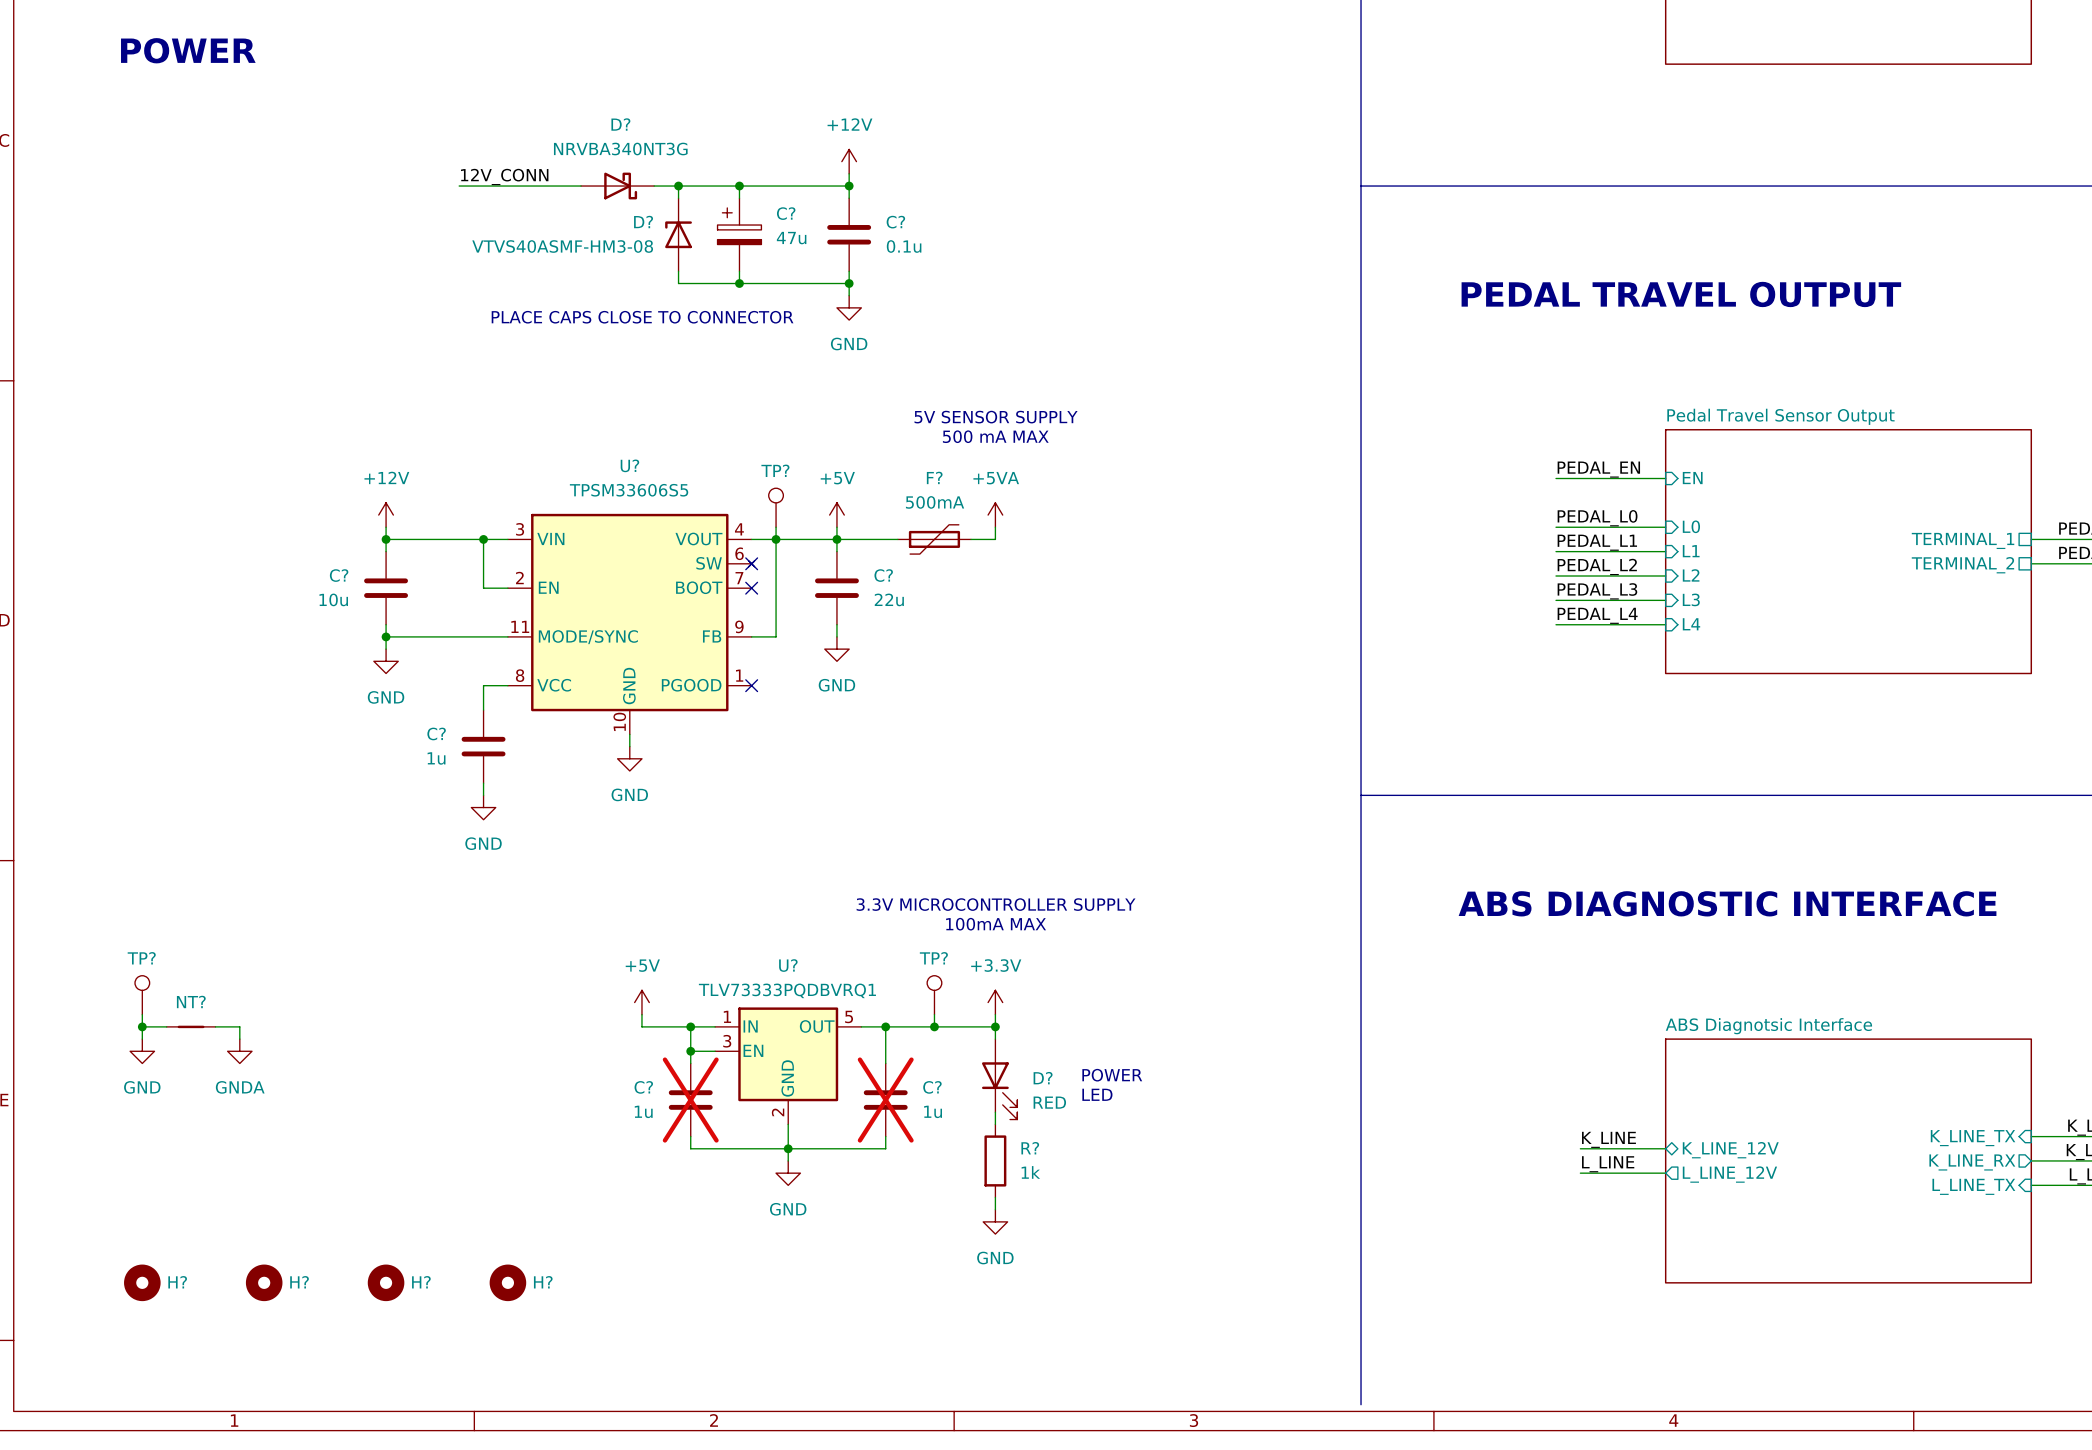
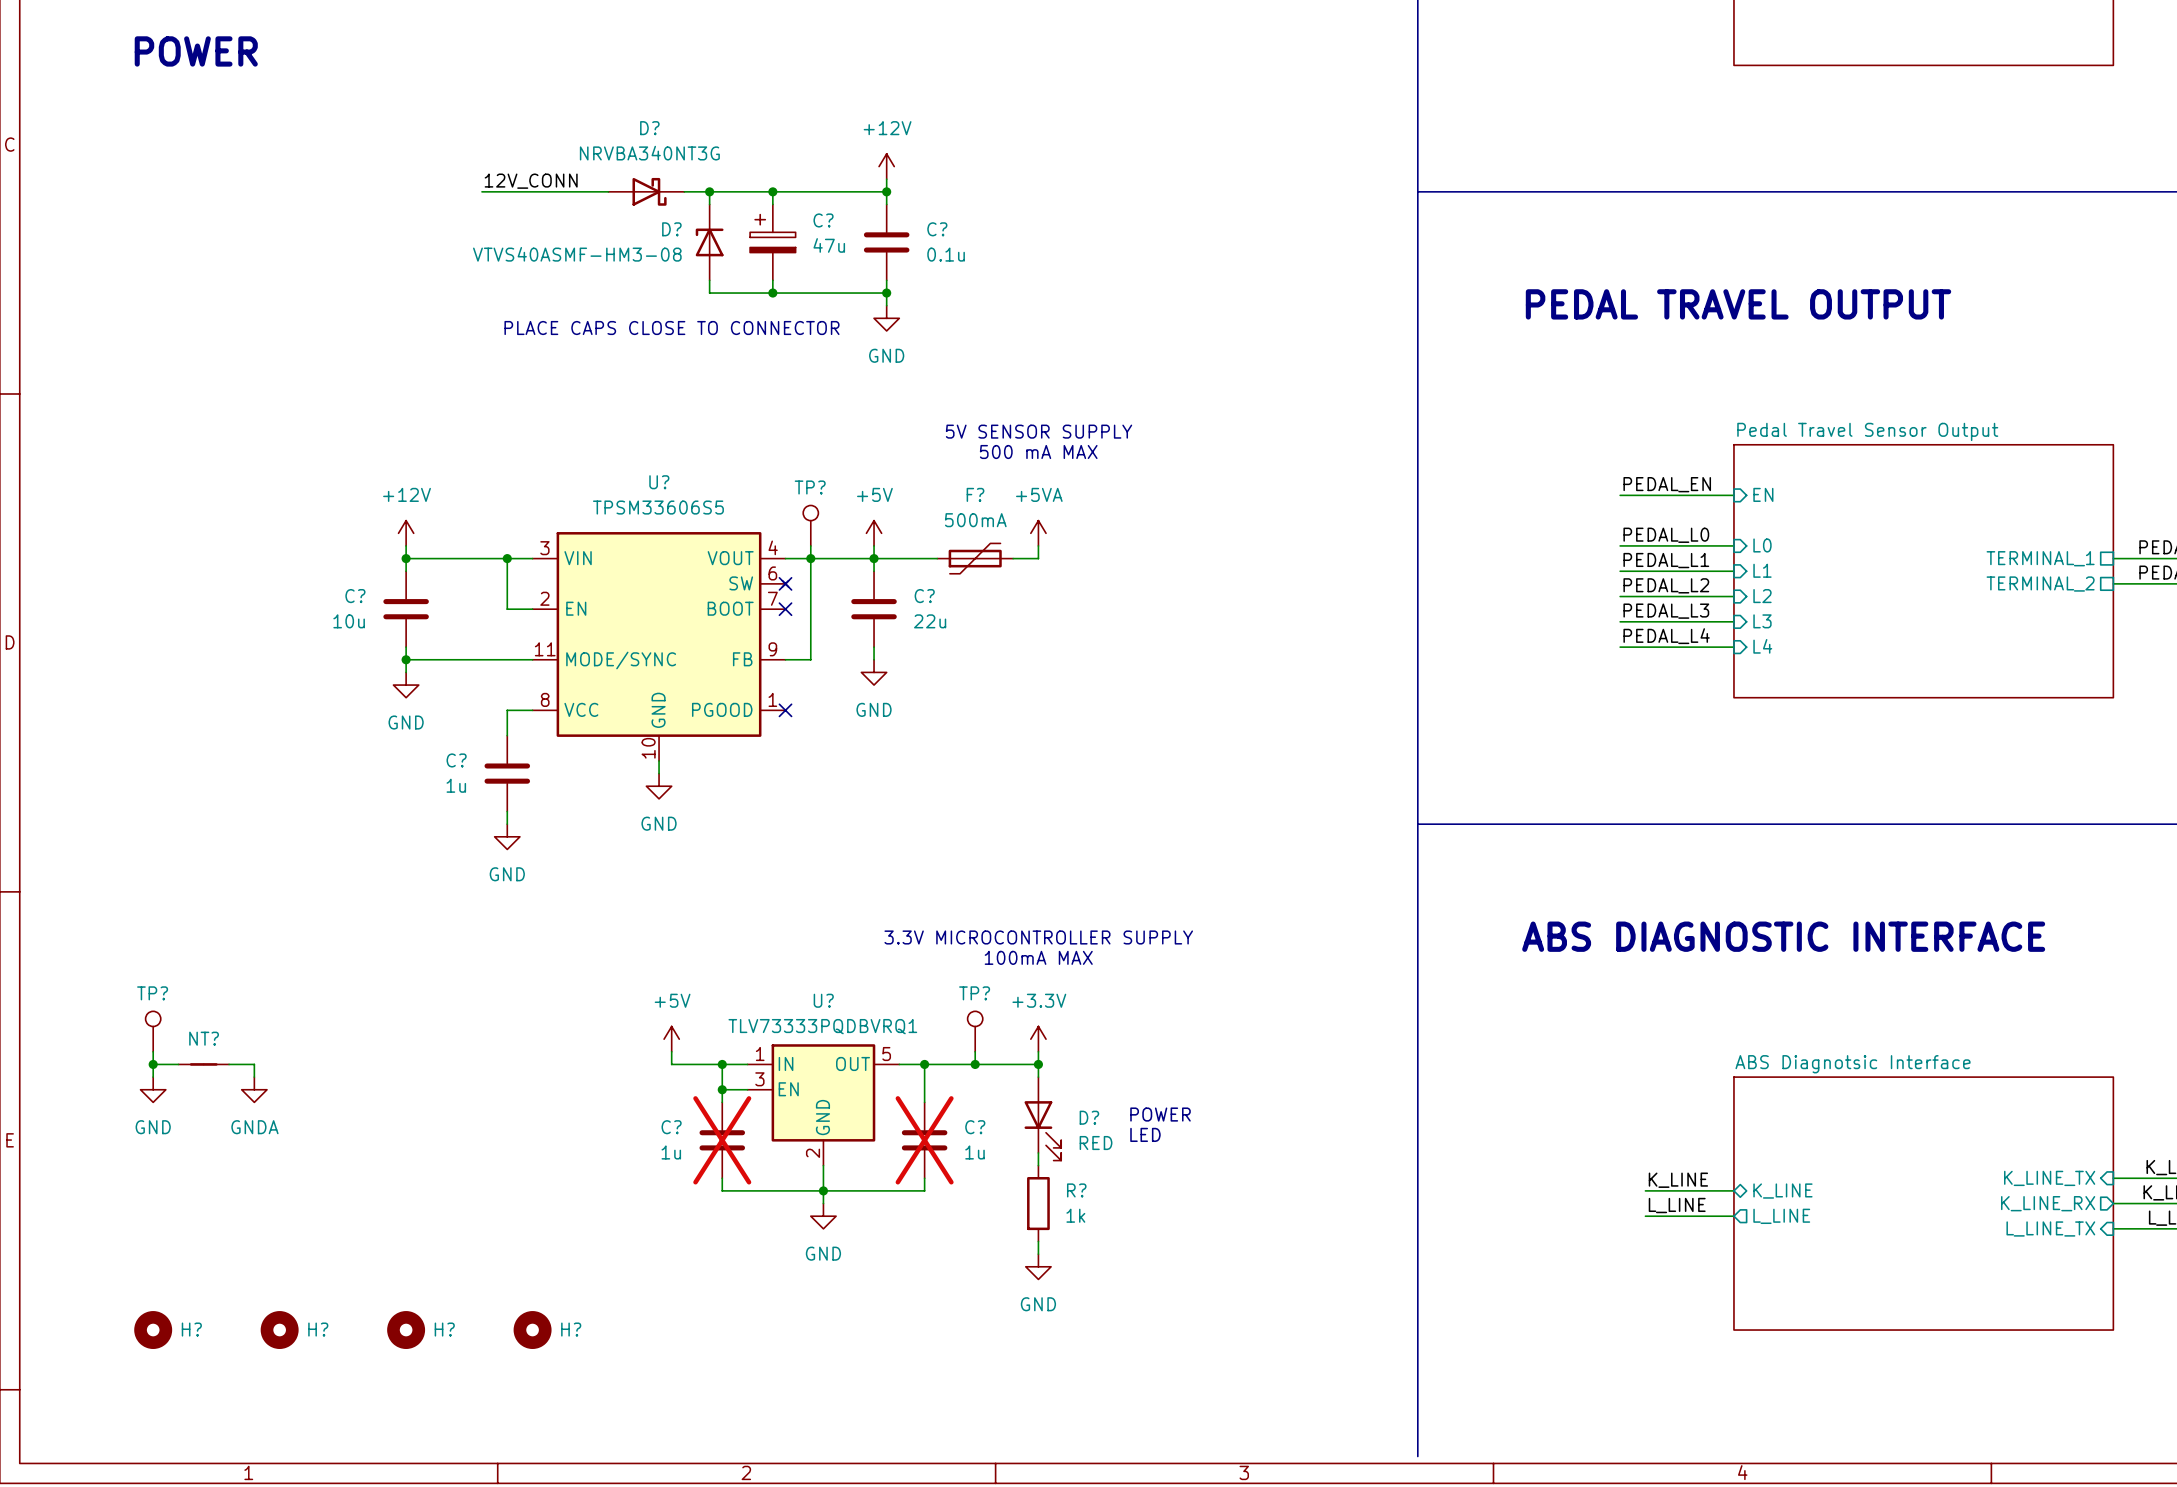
sheet pin: K_LINE_12V (1730, 1150) -> K_LINE (1782, 1191)
sheet pin: L_LINE_12V (1729, 1174) -> L_LINE (1781, 1216)

